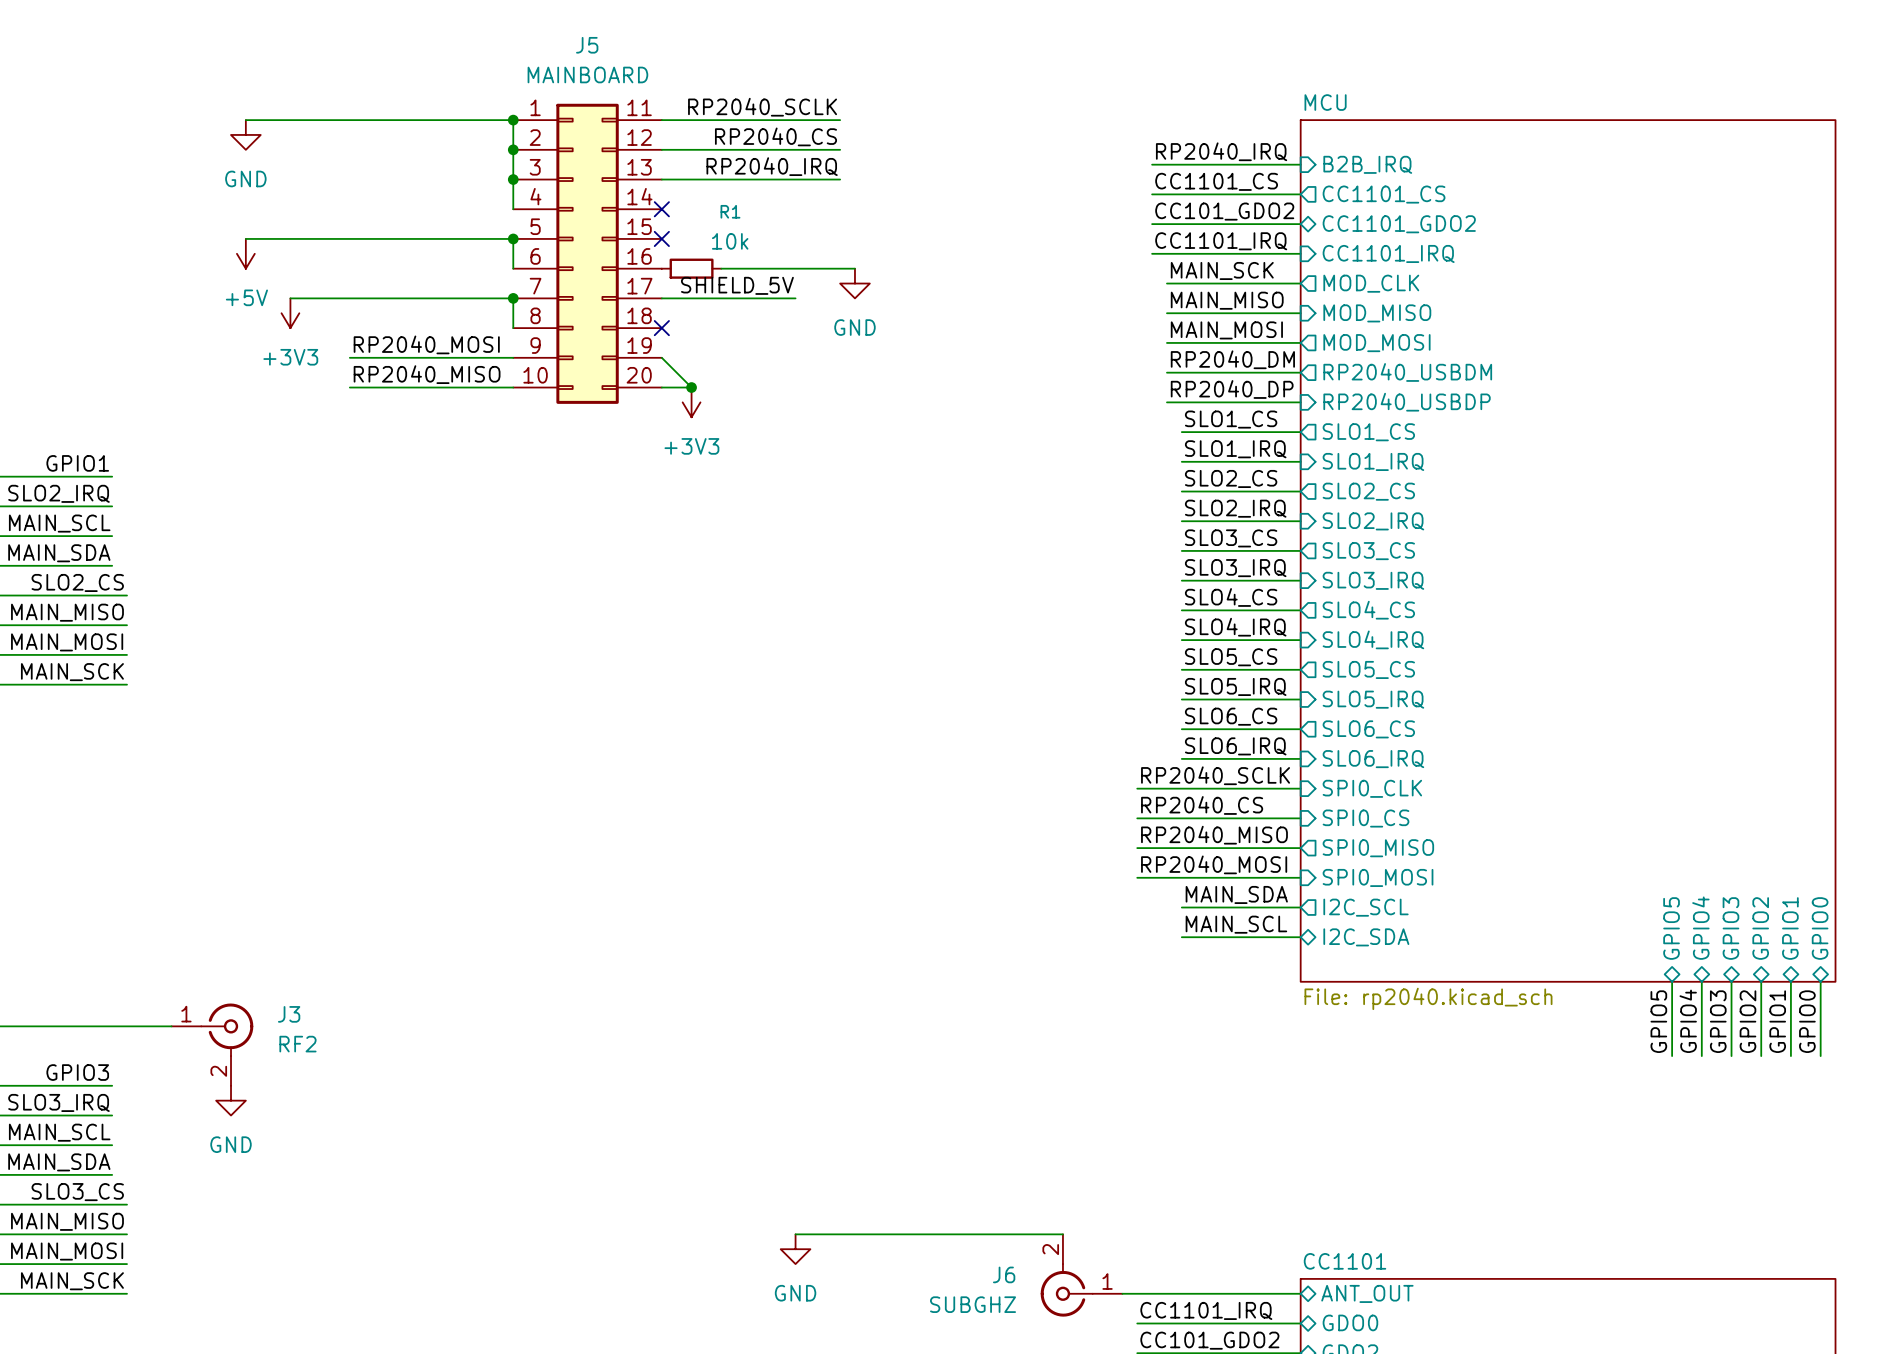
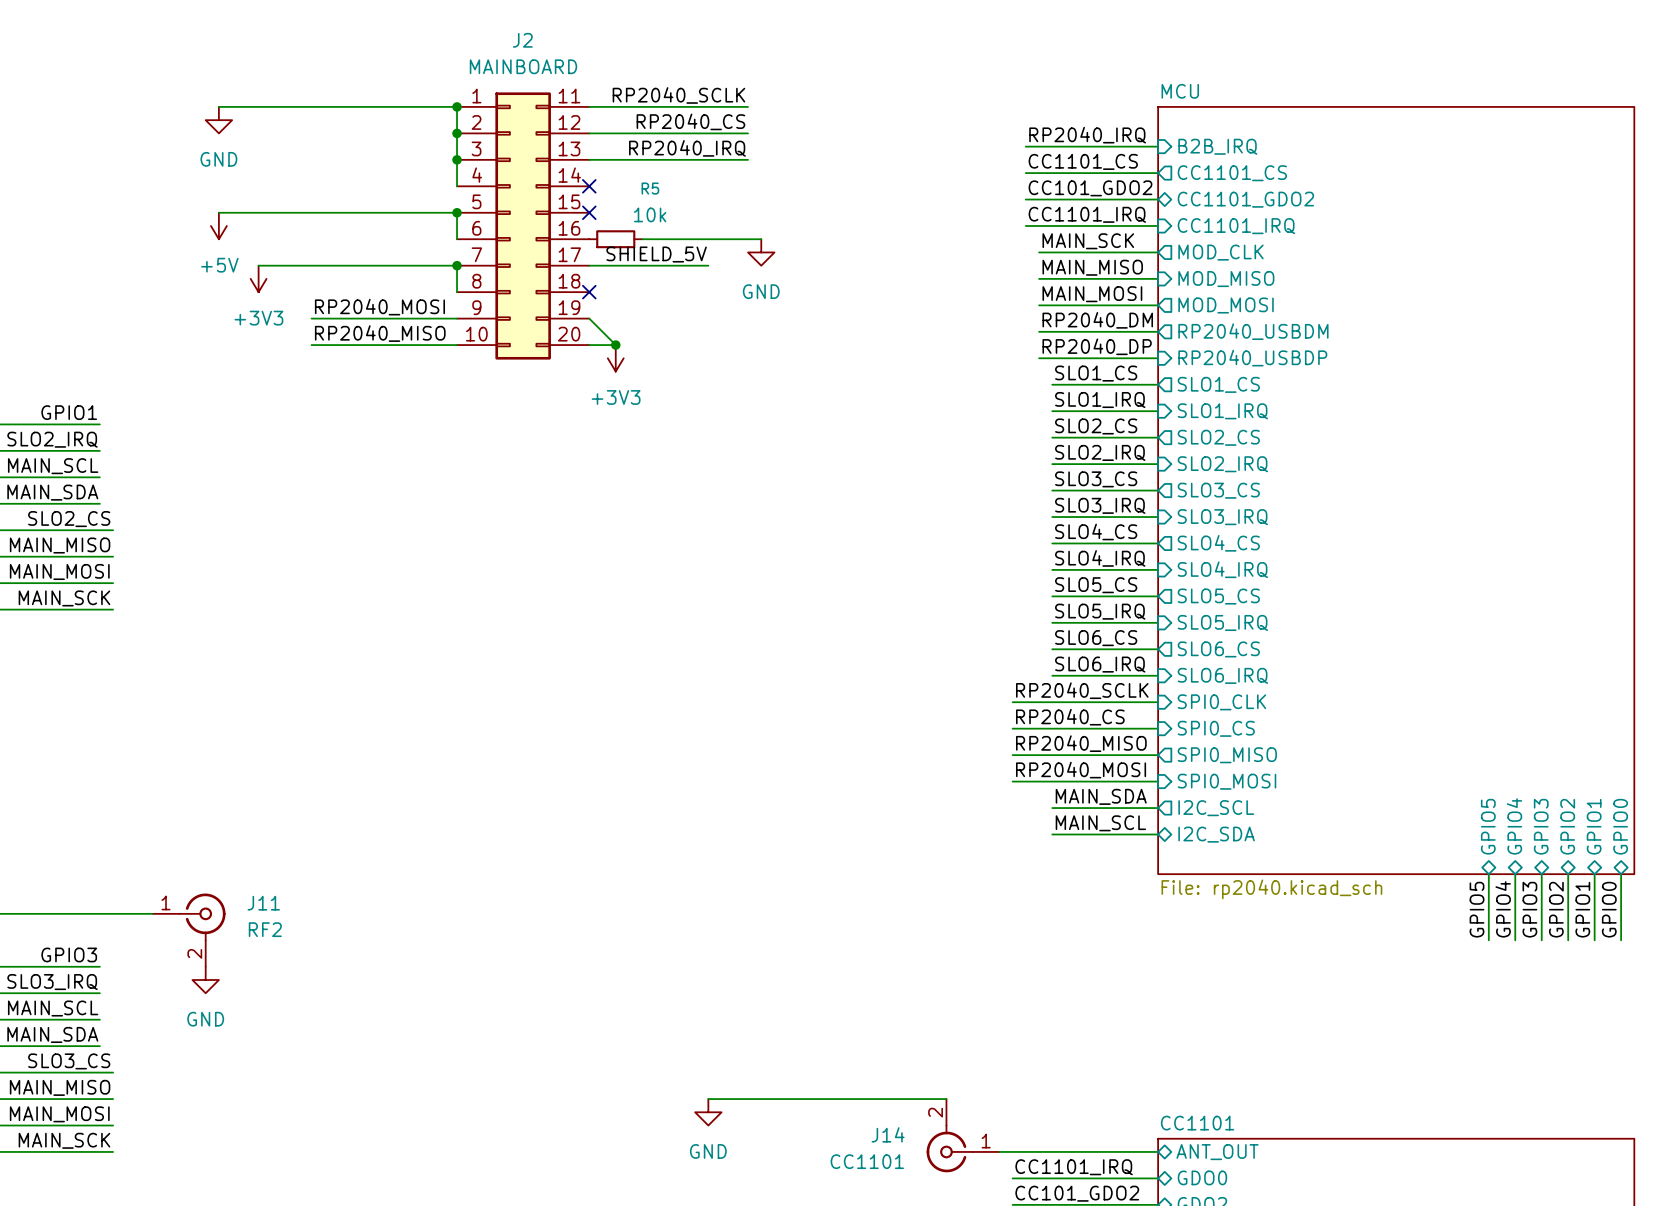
J5 name: J5 (587, 45) -> J2 (522, 40)
R1 name: R1 (730, 211) -> R5 (650, 188)
J3 name: J3 (289, 1014) -> J11 (263, 903)
J6 name: J6 (1004, 1274) -> J14 (888, 1134)
J6 value: SUBGHZ (973, 1304) -> CC1101 (867, 1161)

